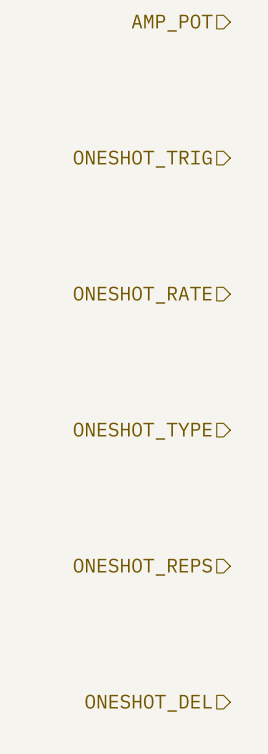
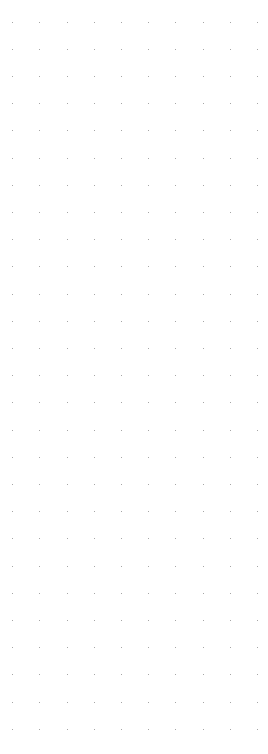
hierarchical label: AMP_POT (172, 23) -> none
hierarchical label: ONESHOT_TRIG (142, 159) -> none
hierarchical label: ONESHOT_RATE (142, 295) -> none
hierarchical label: ONESHOT_TYPE (142, 431) -> none
hierarchical label: ONESHOT_REPS (142, 567) -> none
hierarchical label: ONESHOT_DEL (148, 703) -> none

